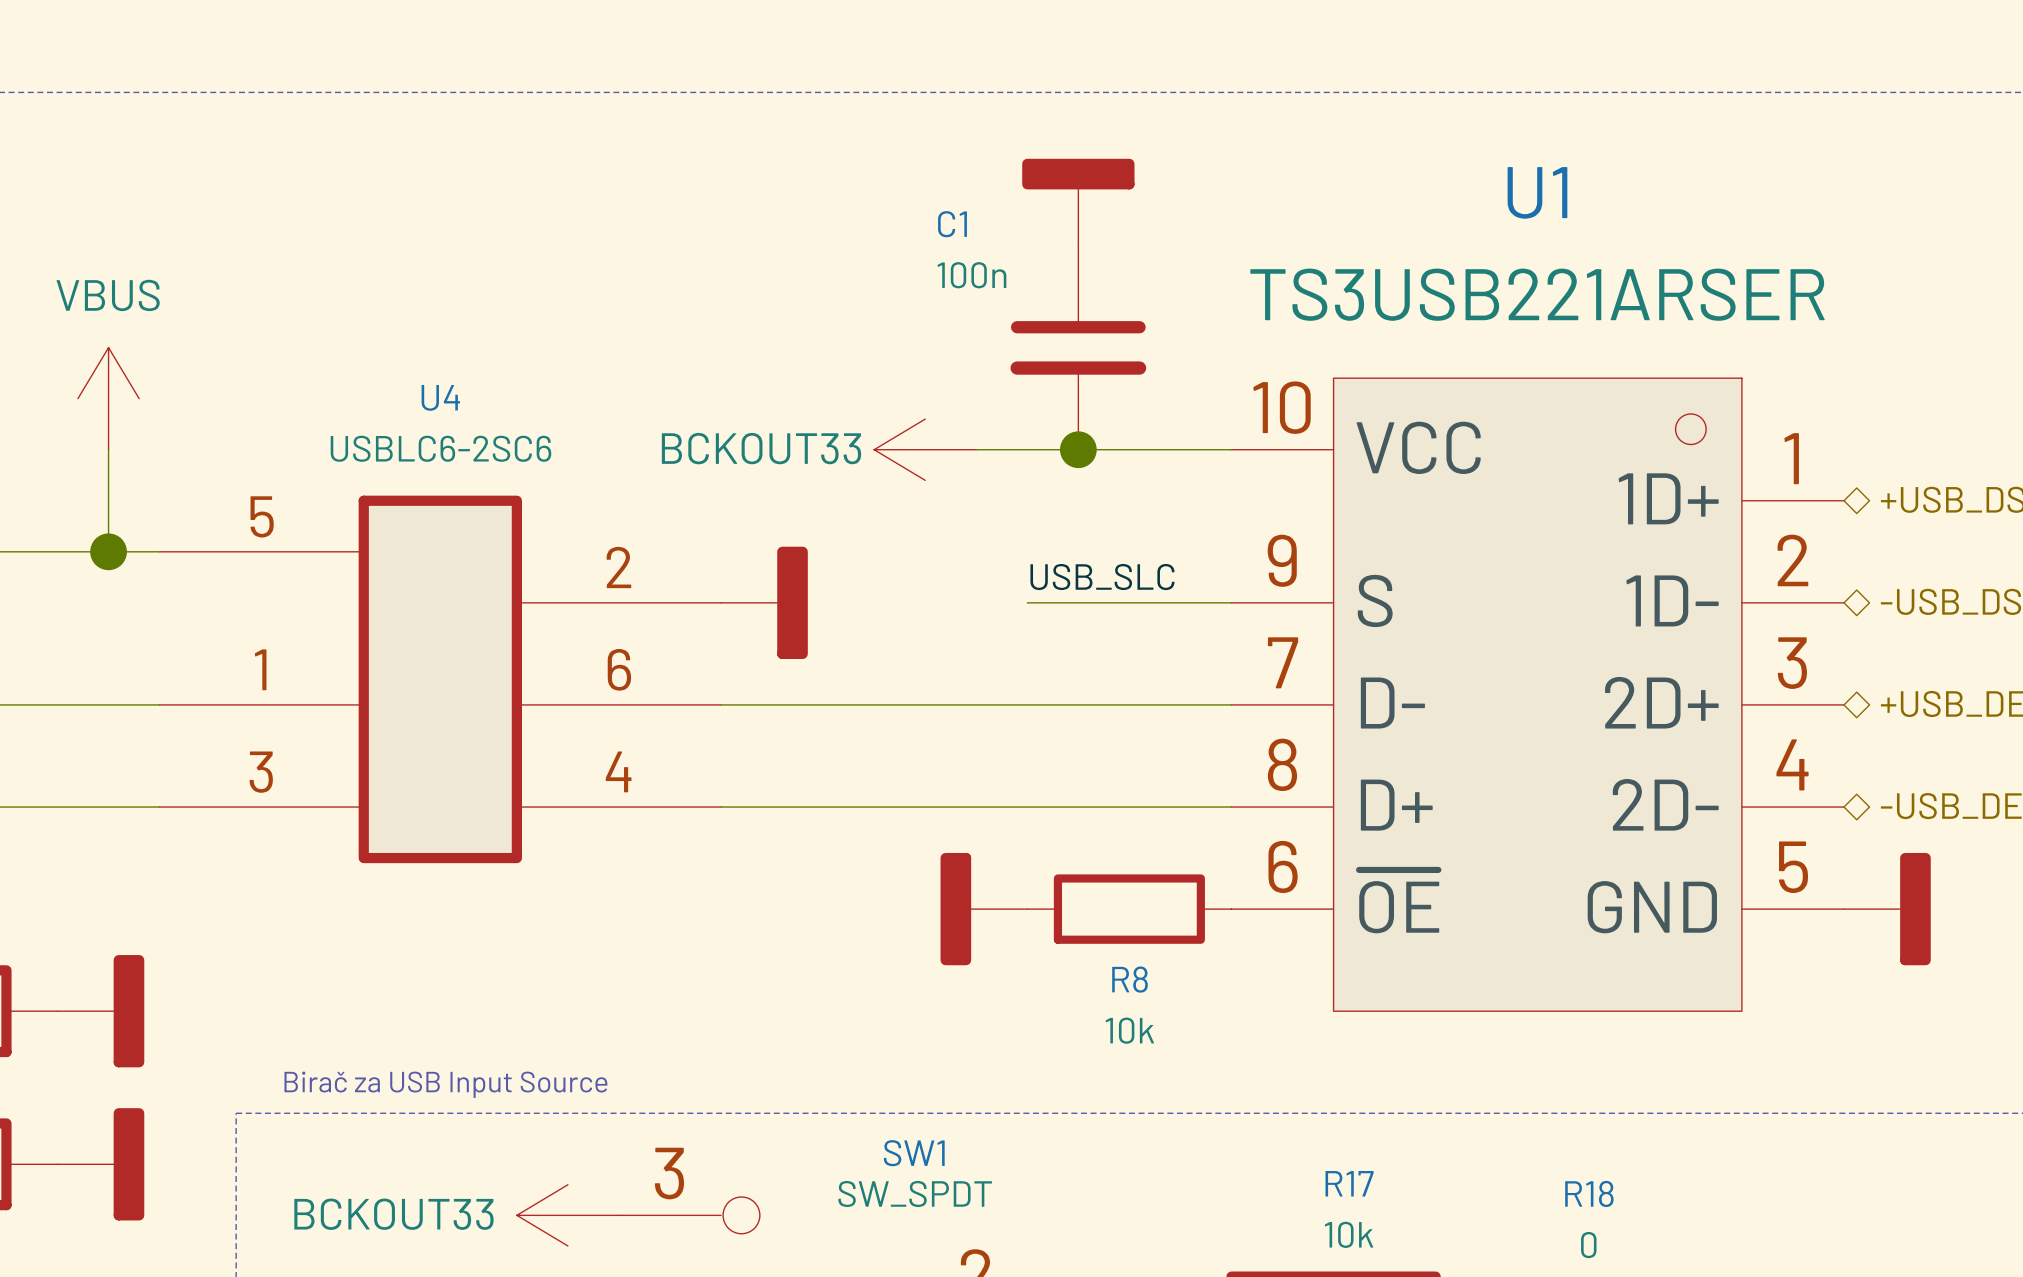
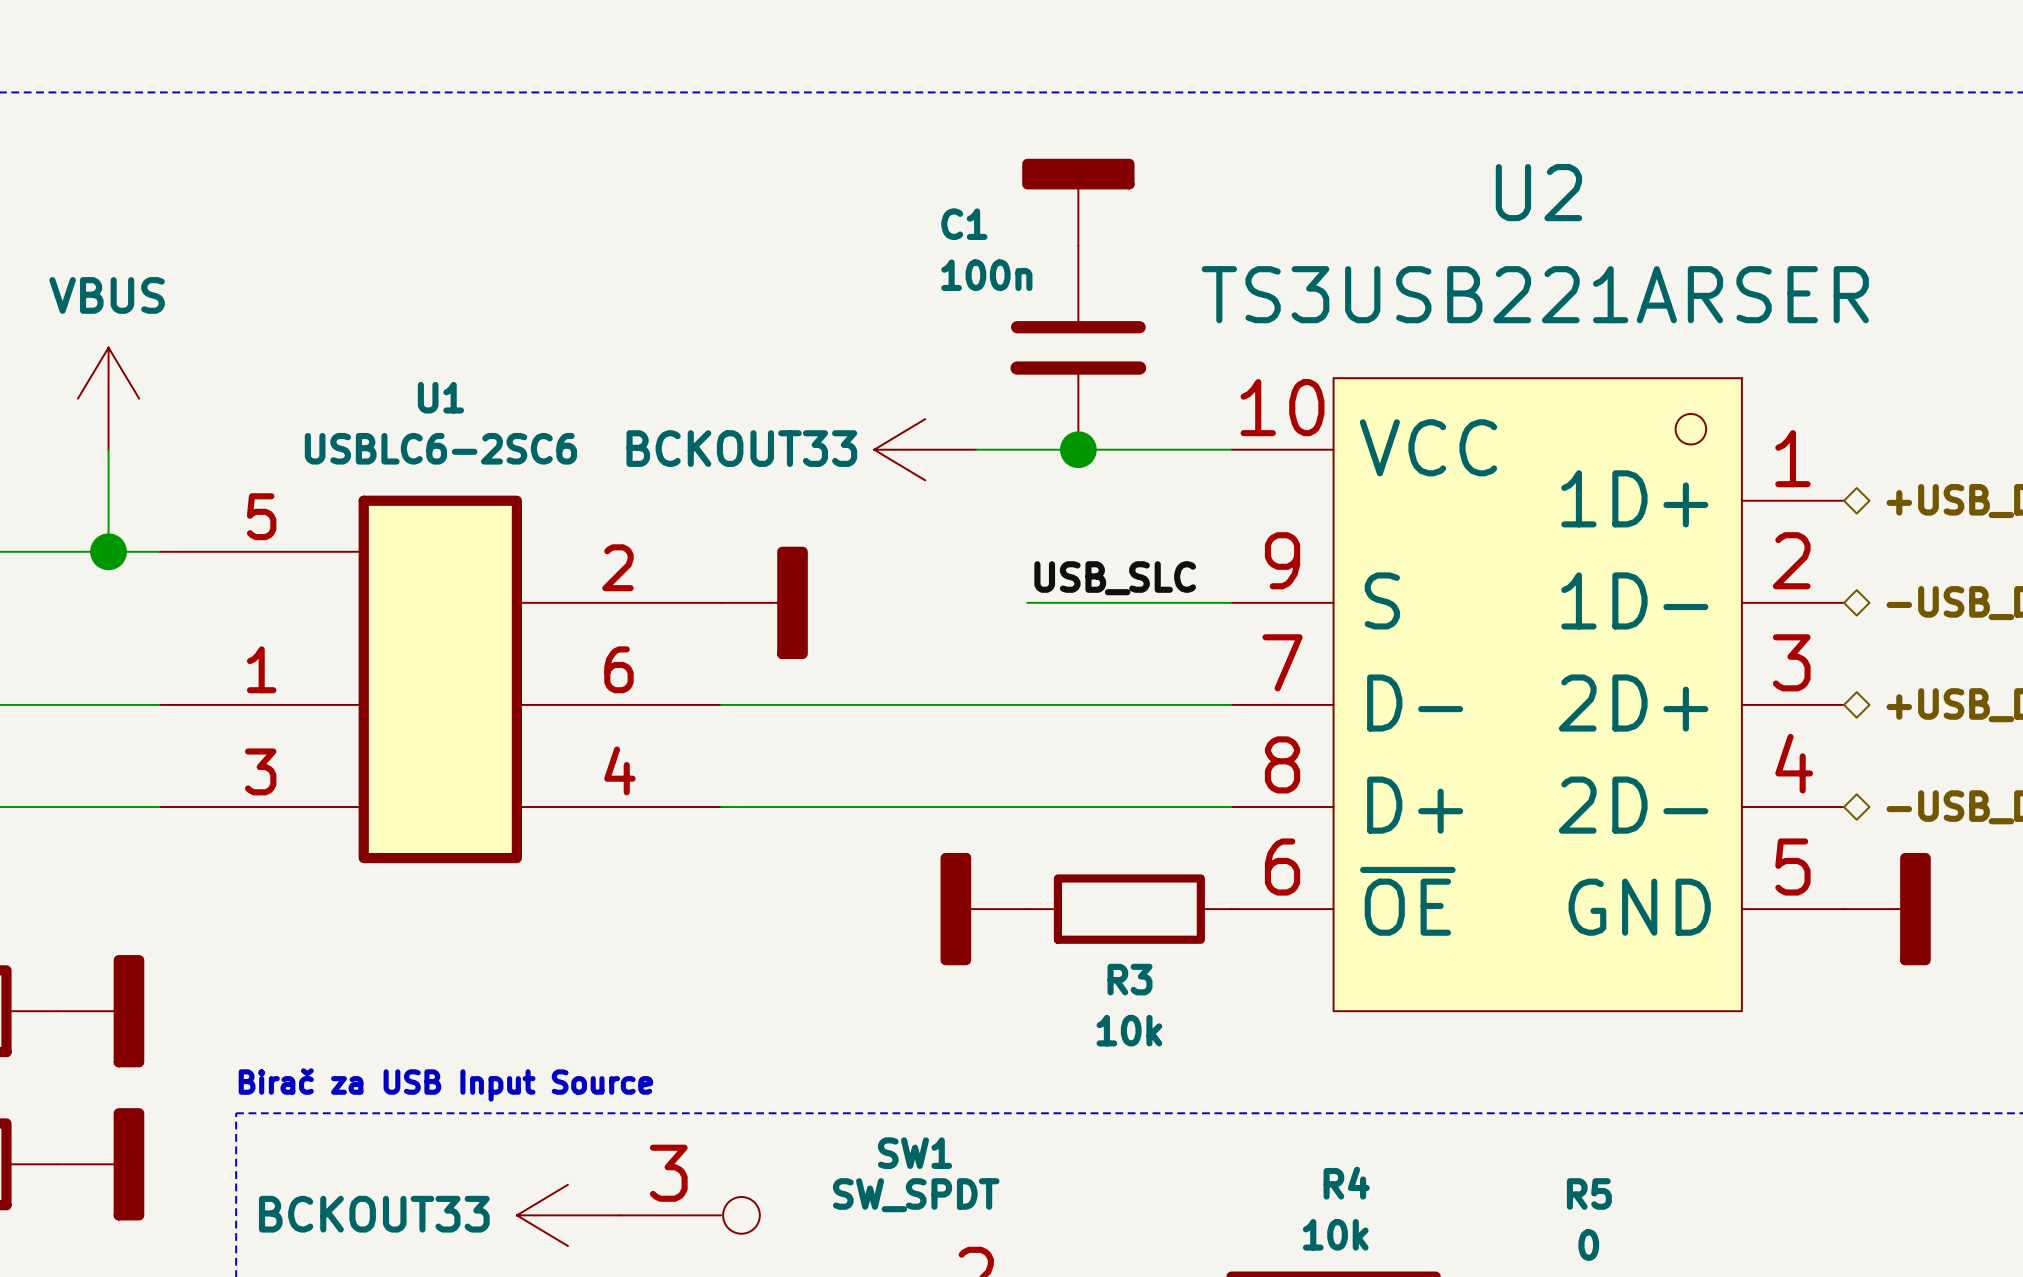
U1 name: U1 (1537, 192) -> U2 (1538, 192)
U4 name: U4 (440, 397) -> U1 (440, 397)
R8 name: R8 (1130, 979) -> R3 (1130, 979)
R17 name: R17 (1349, 1183) -> R4 (1346, 1183)
R18 name: R18 (1589, 1193) -> R5 (1589, 1193)

